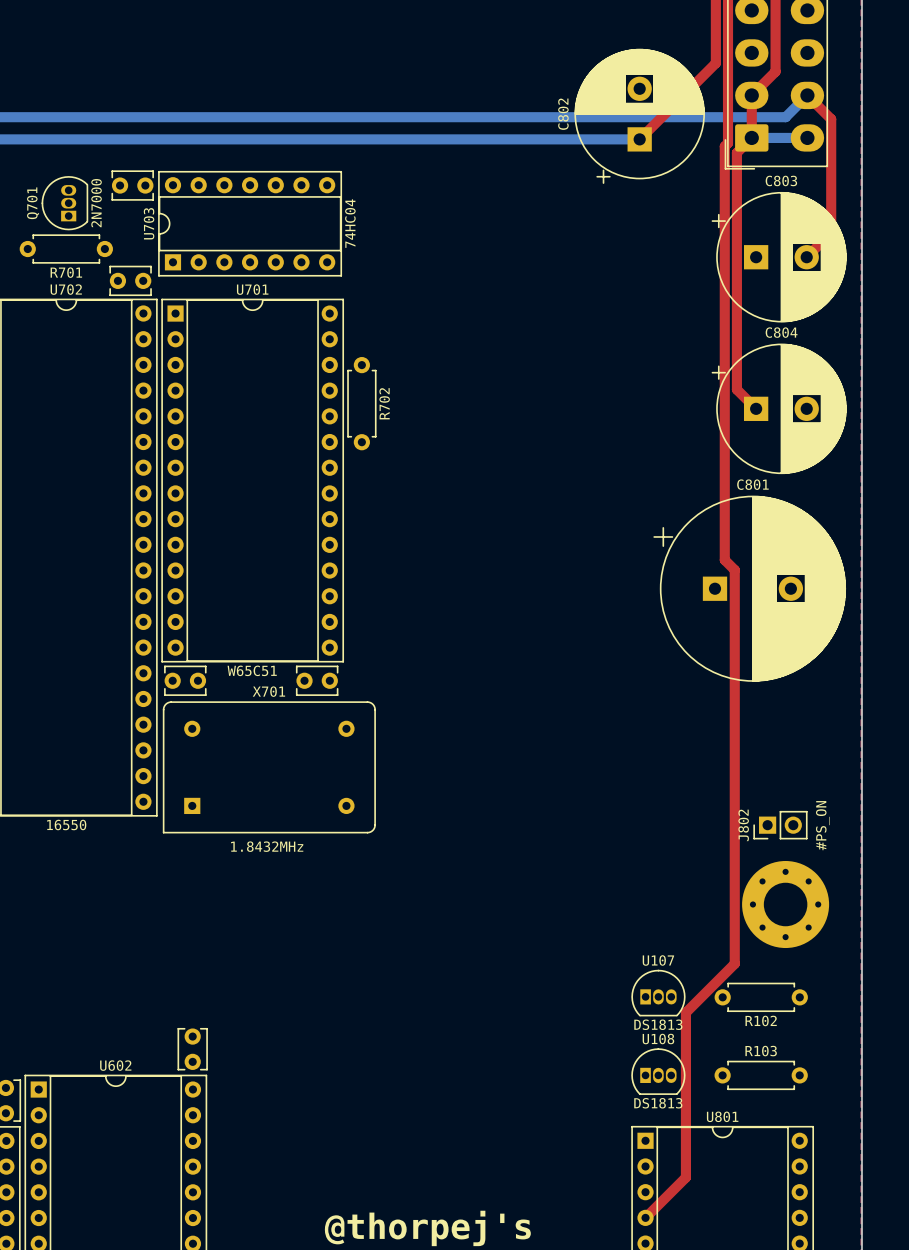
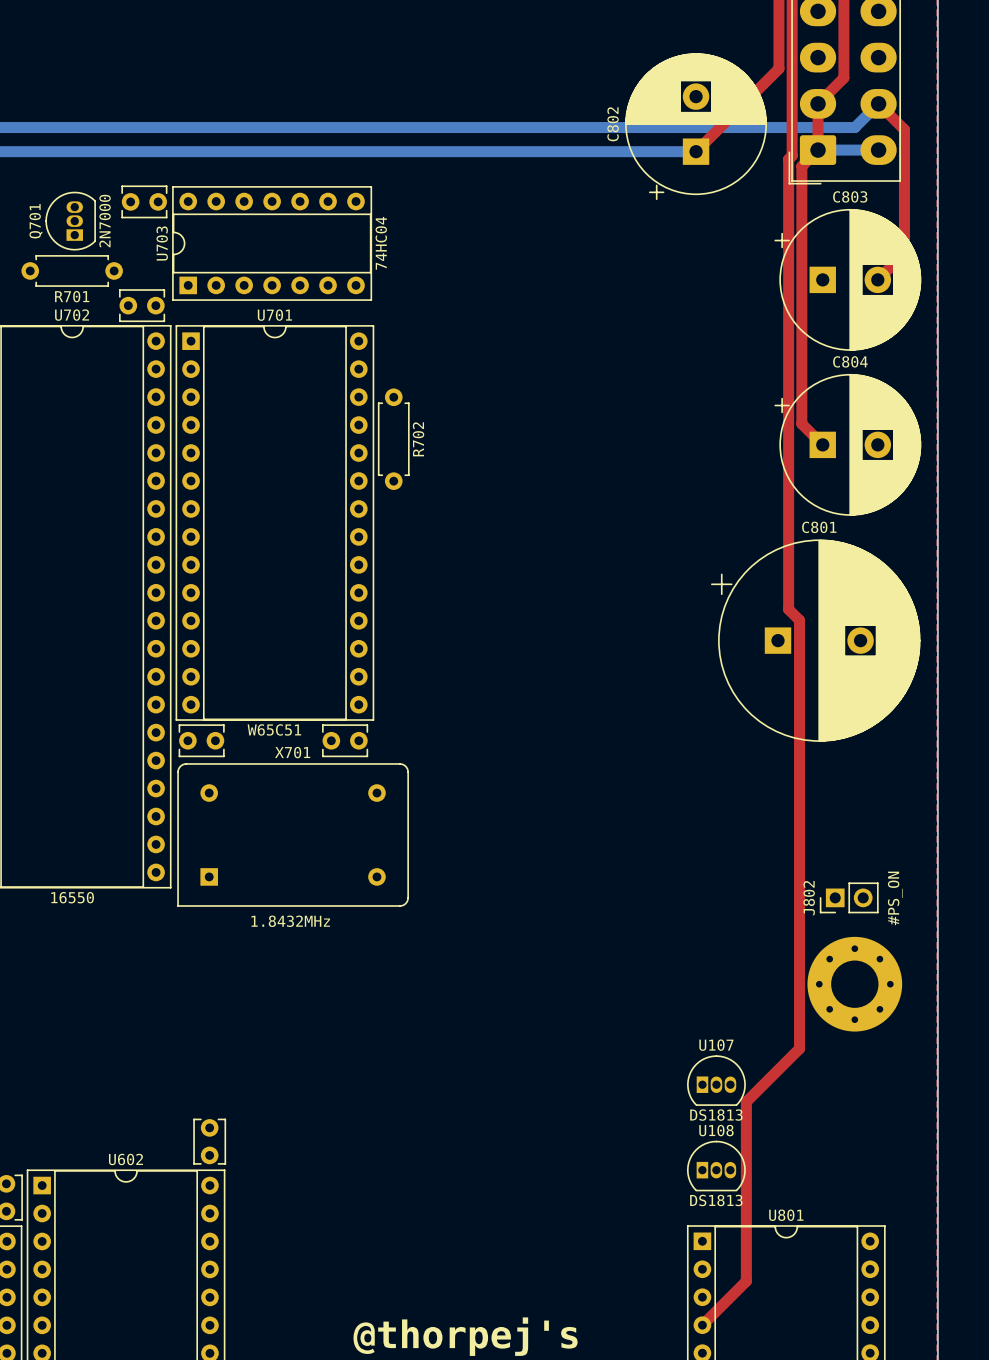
R102: (761, 997) -> none
R103: (761, 1075) -> none

